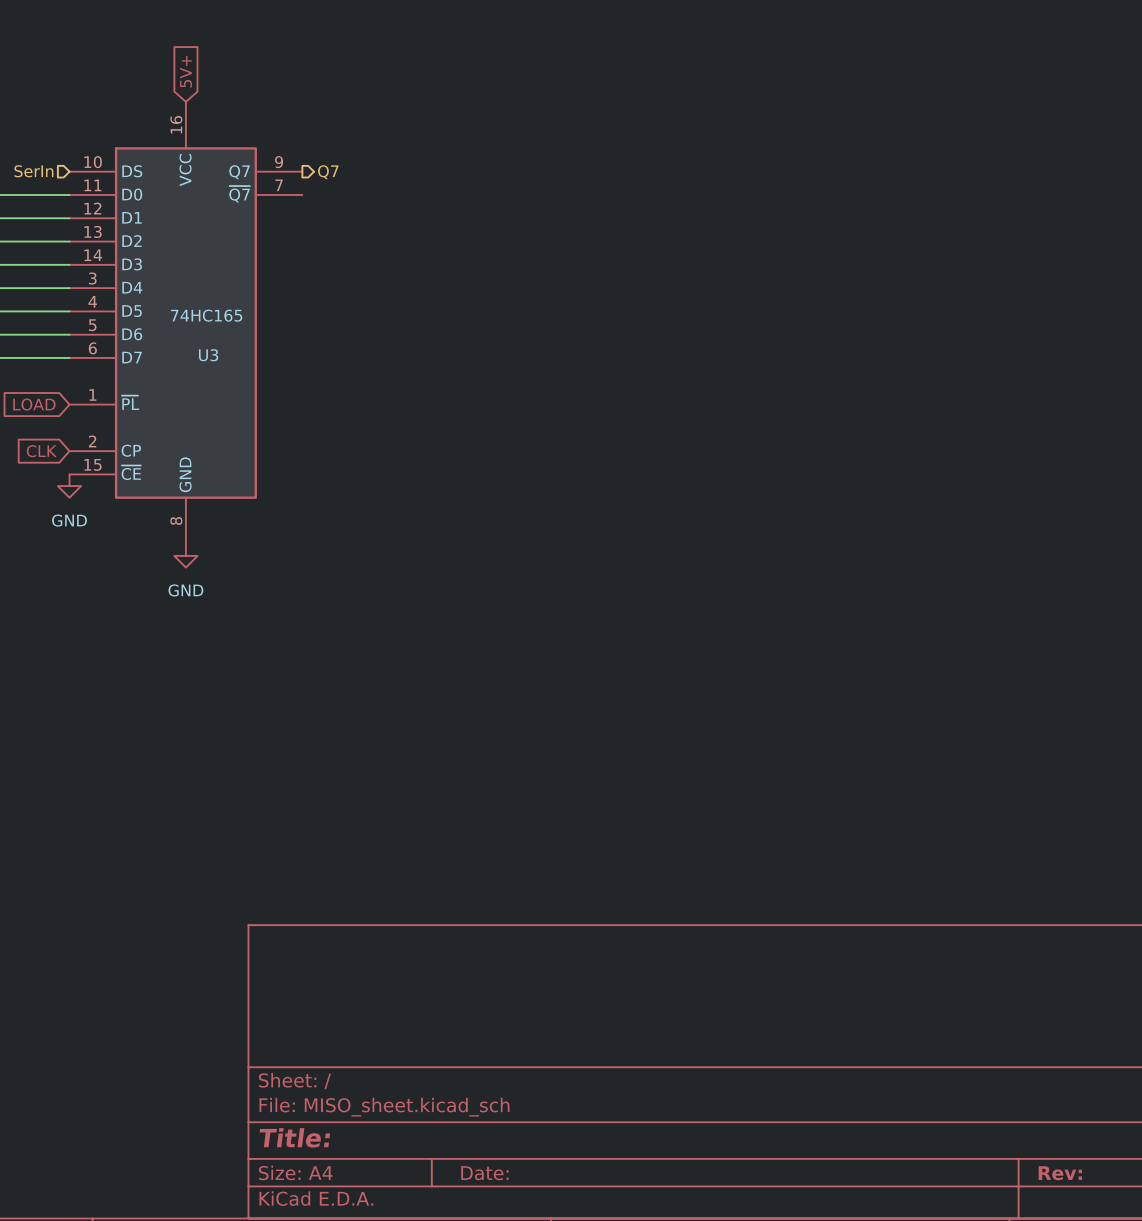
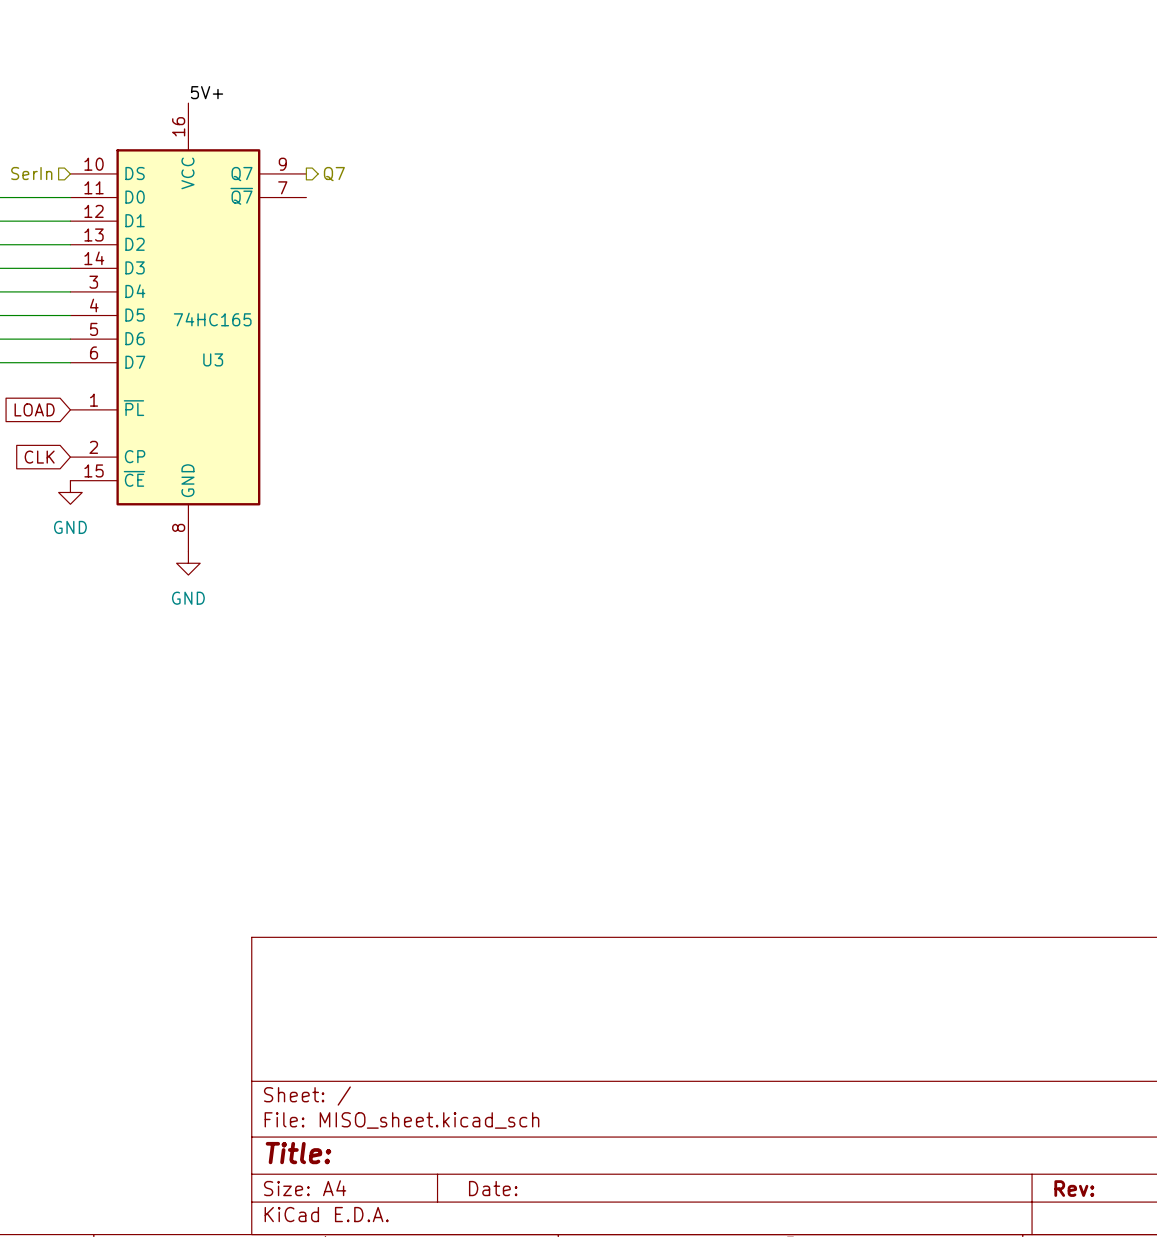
global label: 5V+ (186, 71) -> none
label: none -> 5V+ (207, 92)

